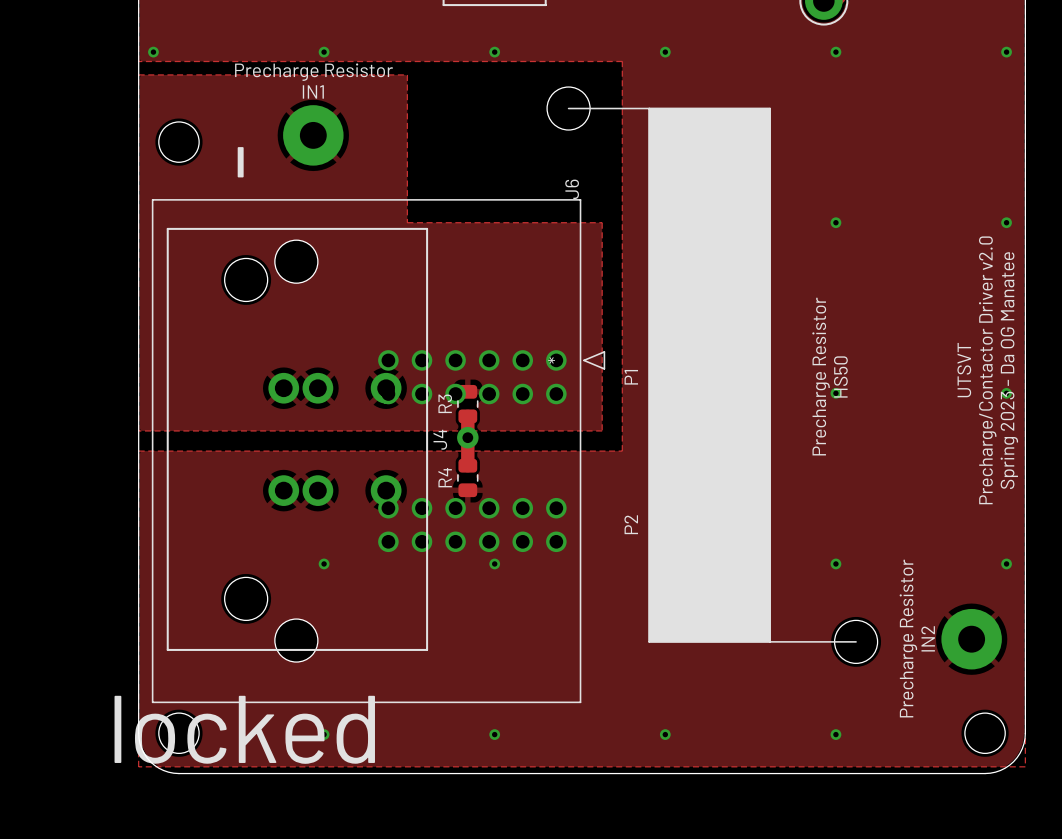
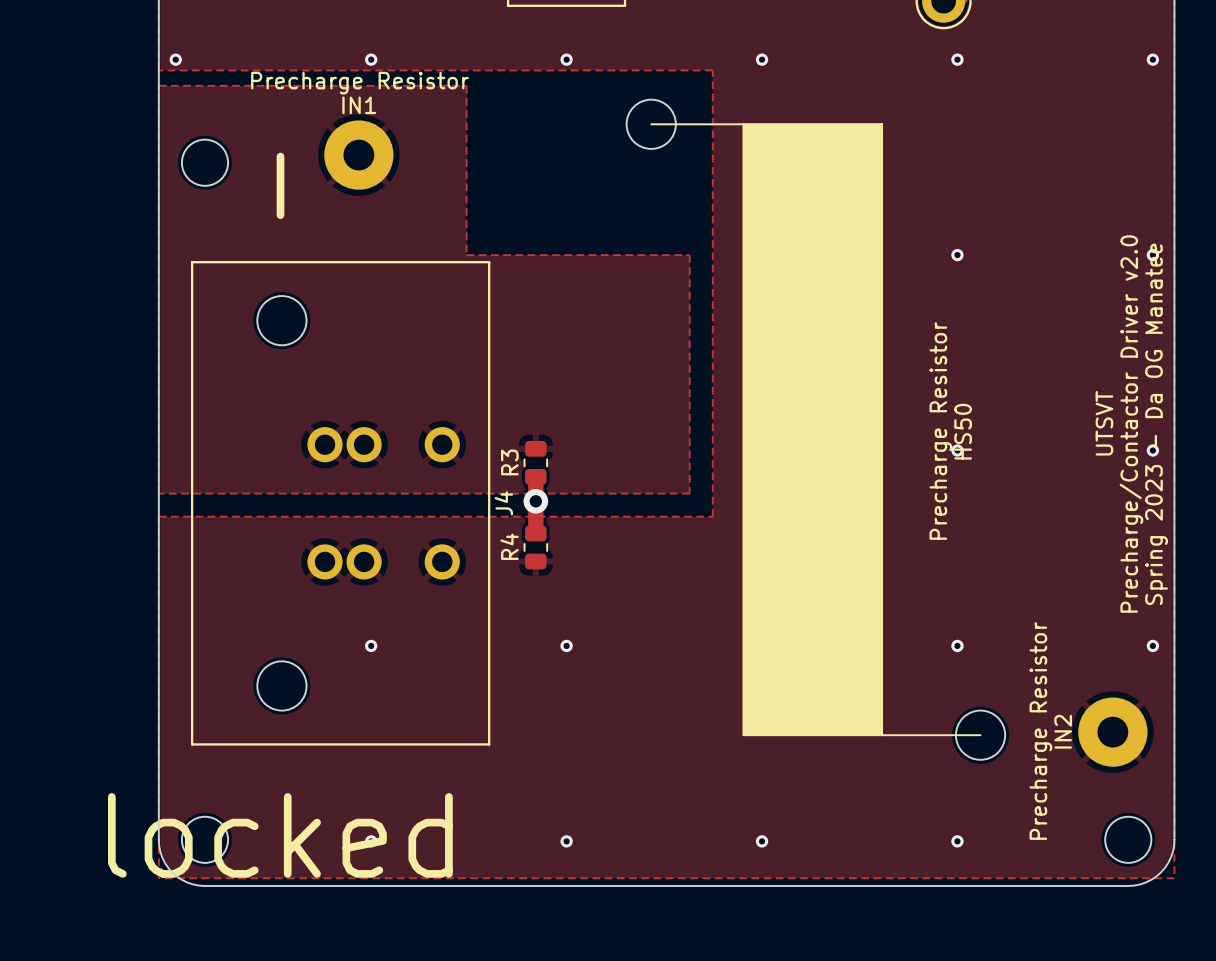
J6: (378, 451) -> none

